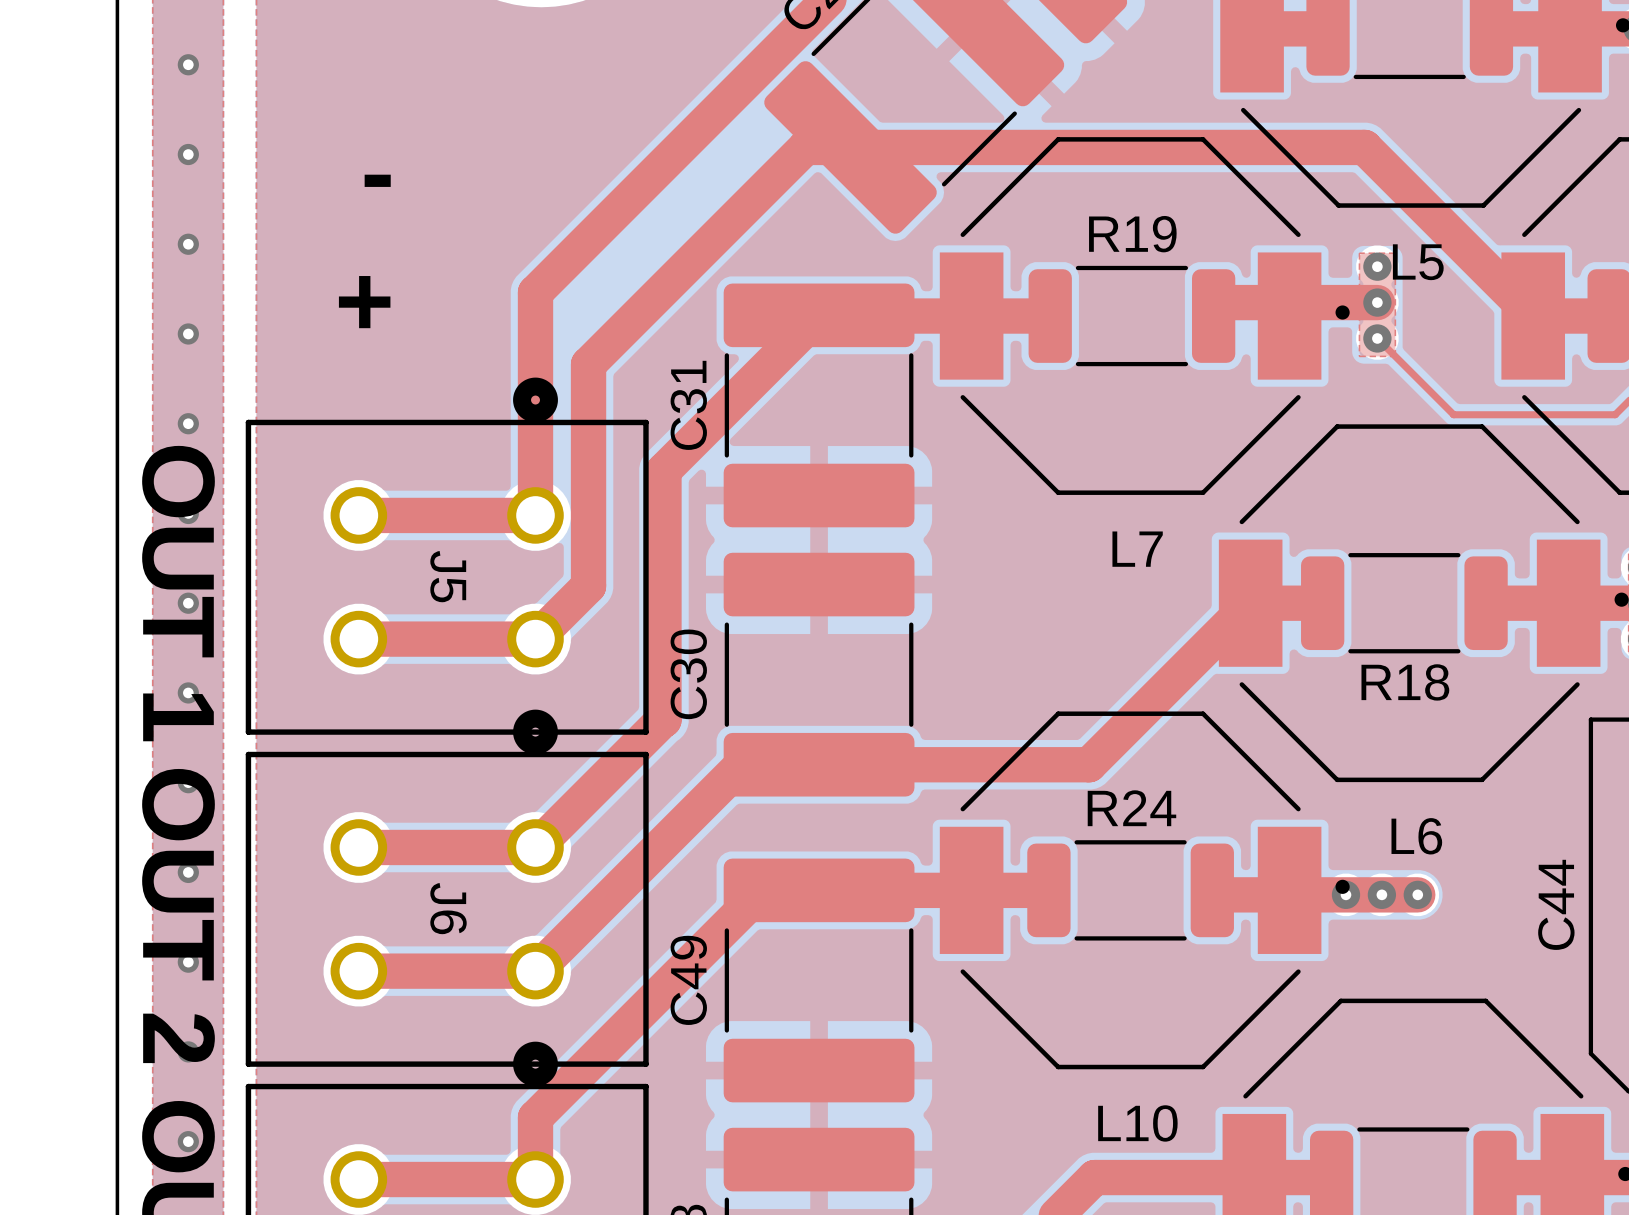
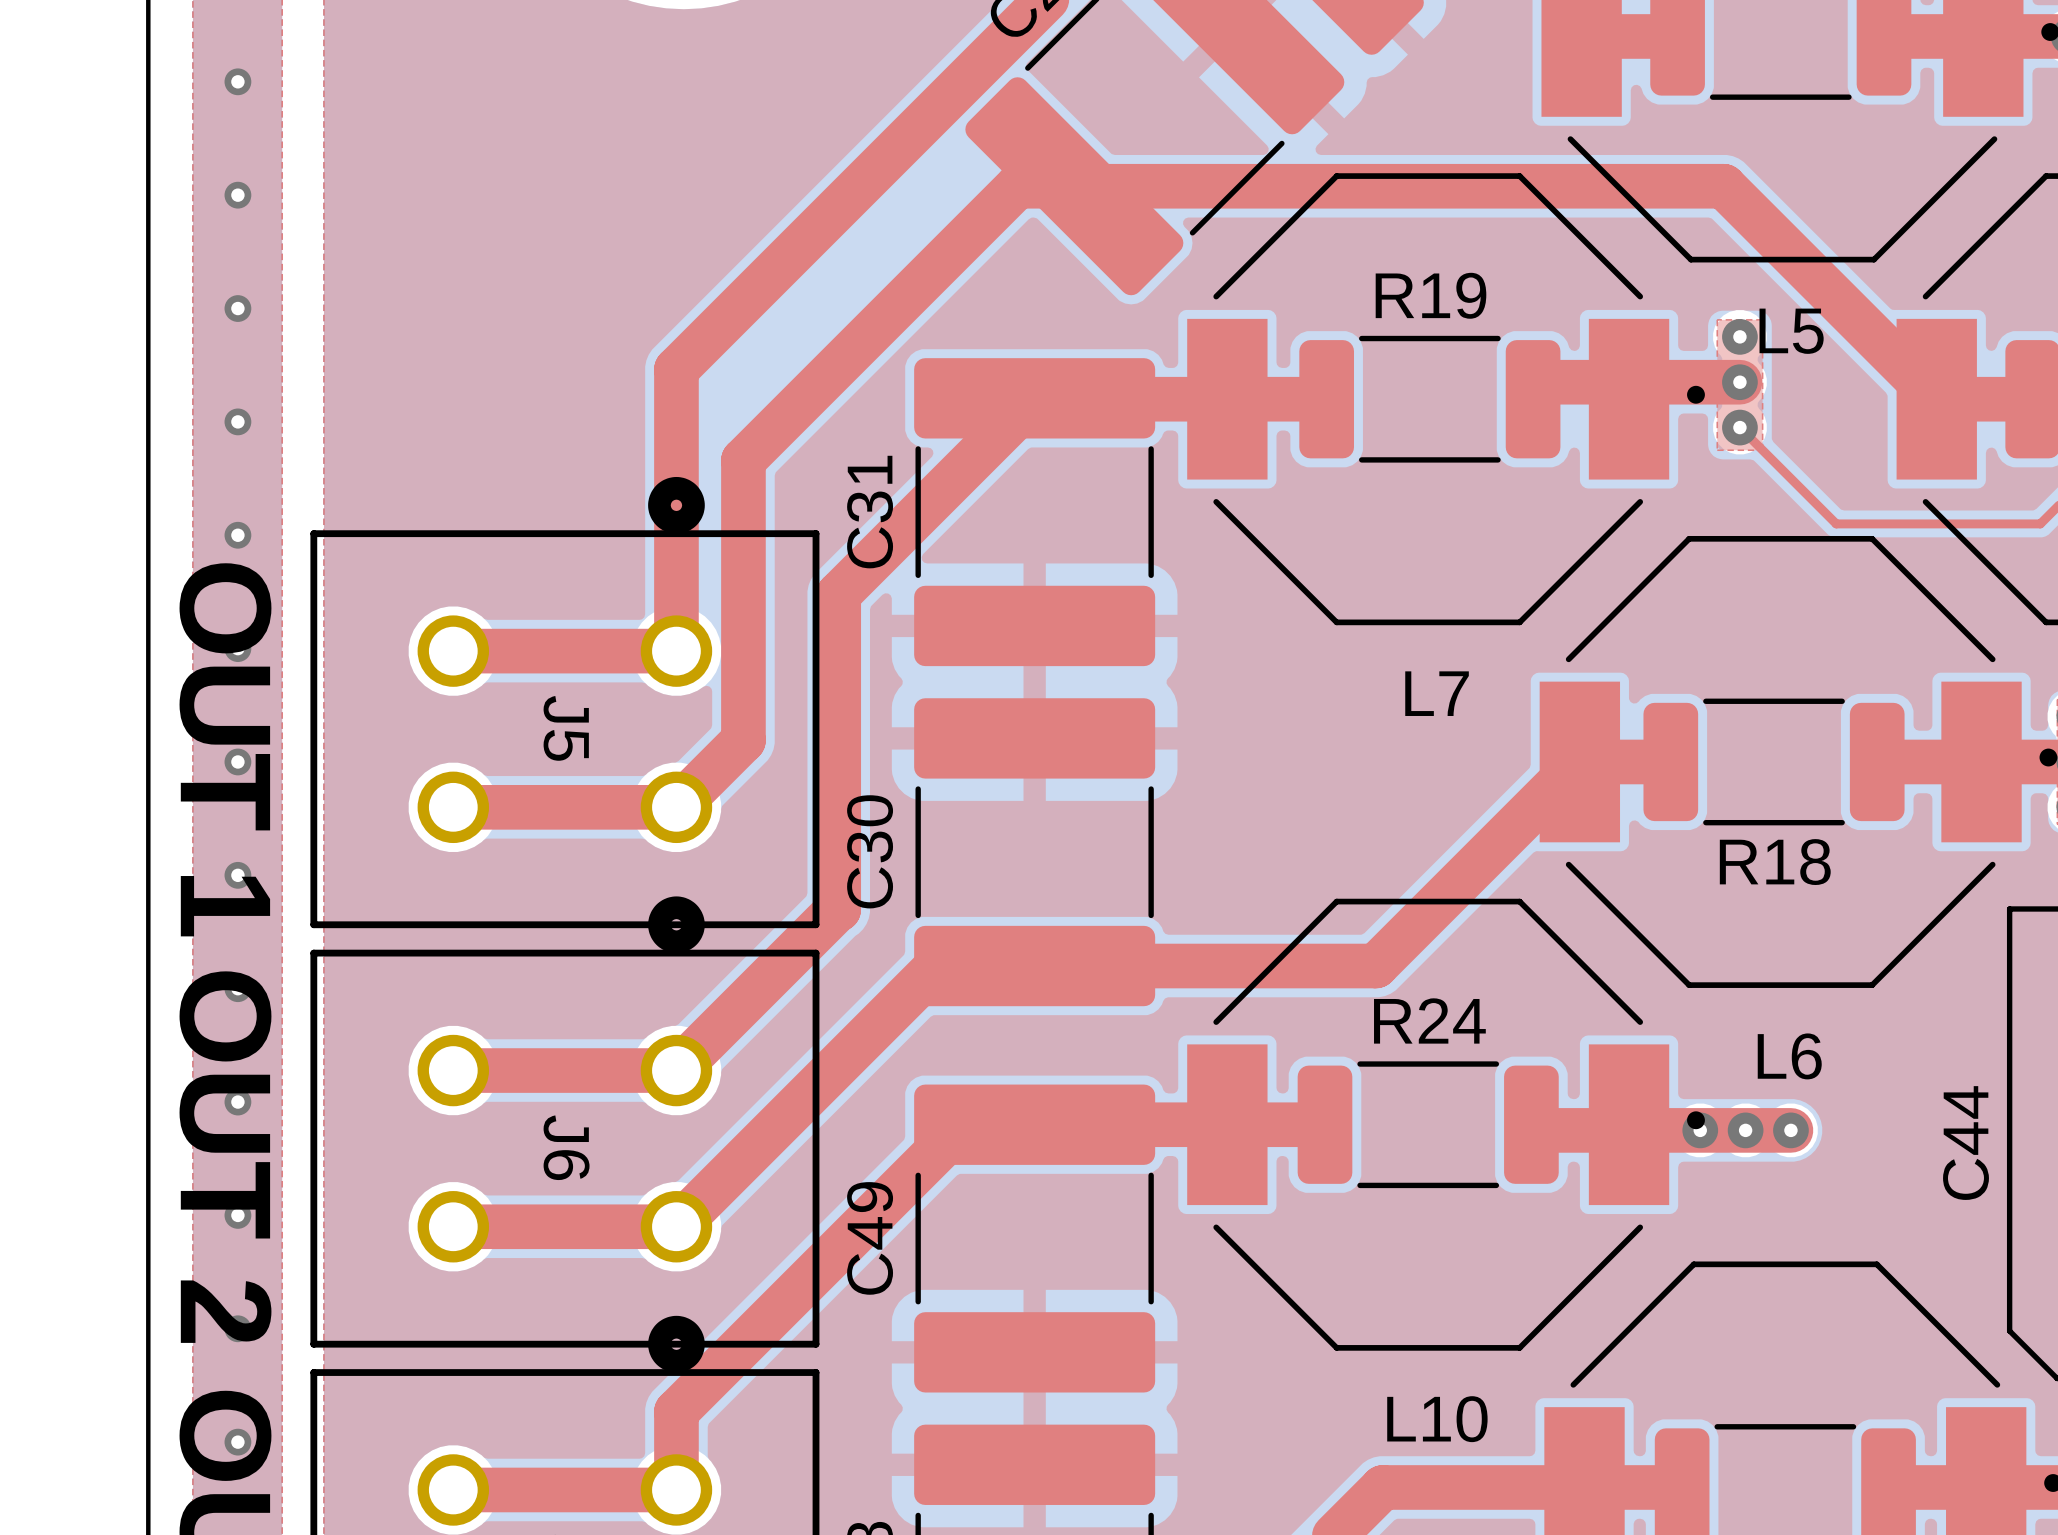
text: - (377, 180) -> none
text: + (364, 302) -> none

